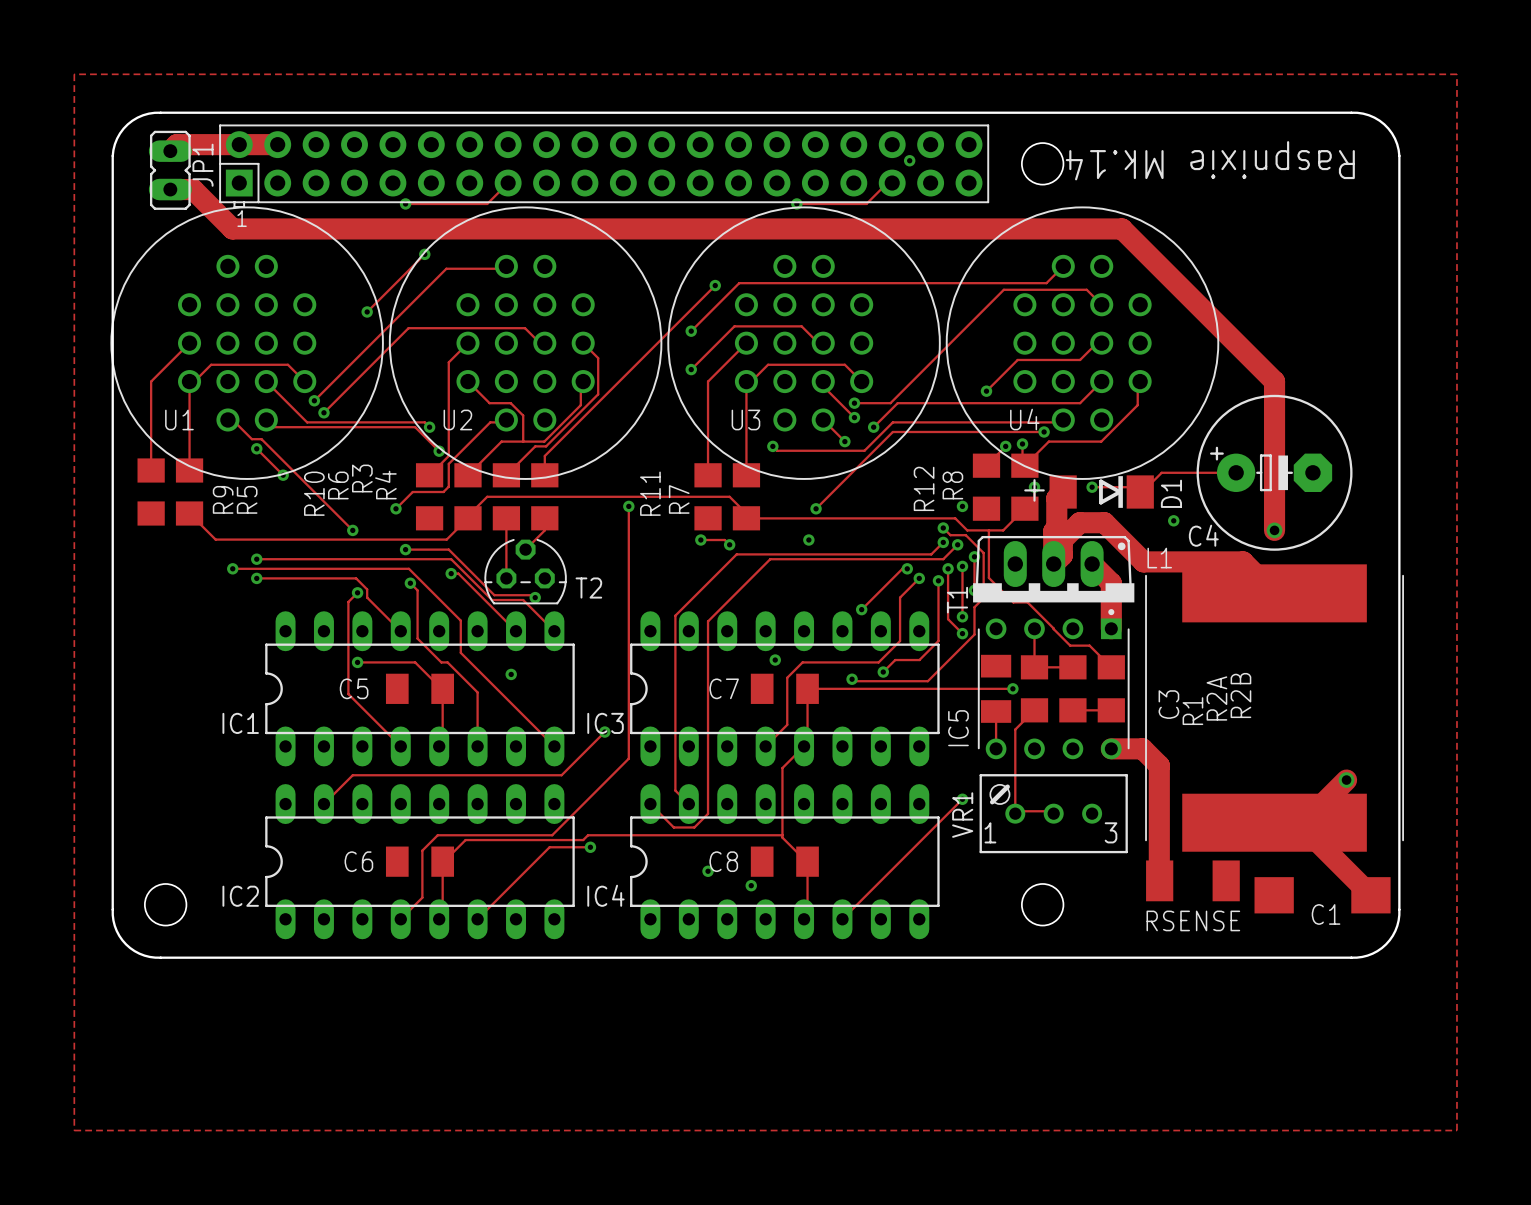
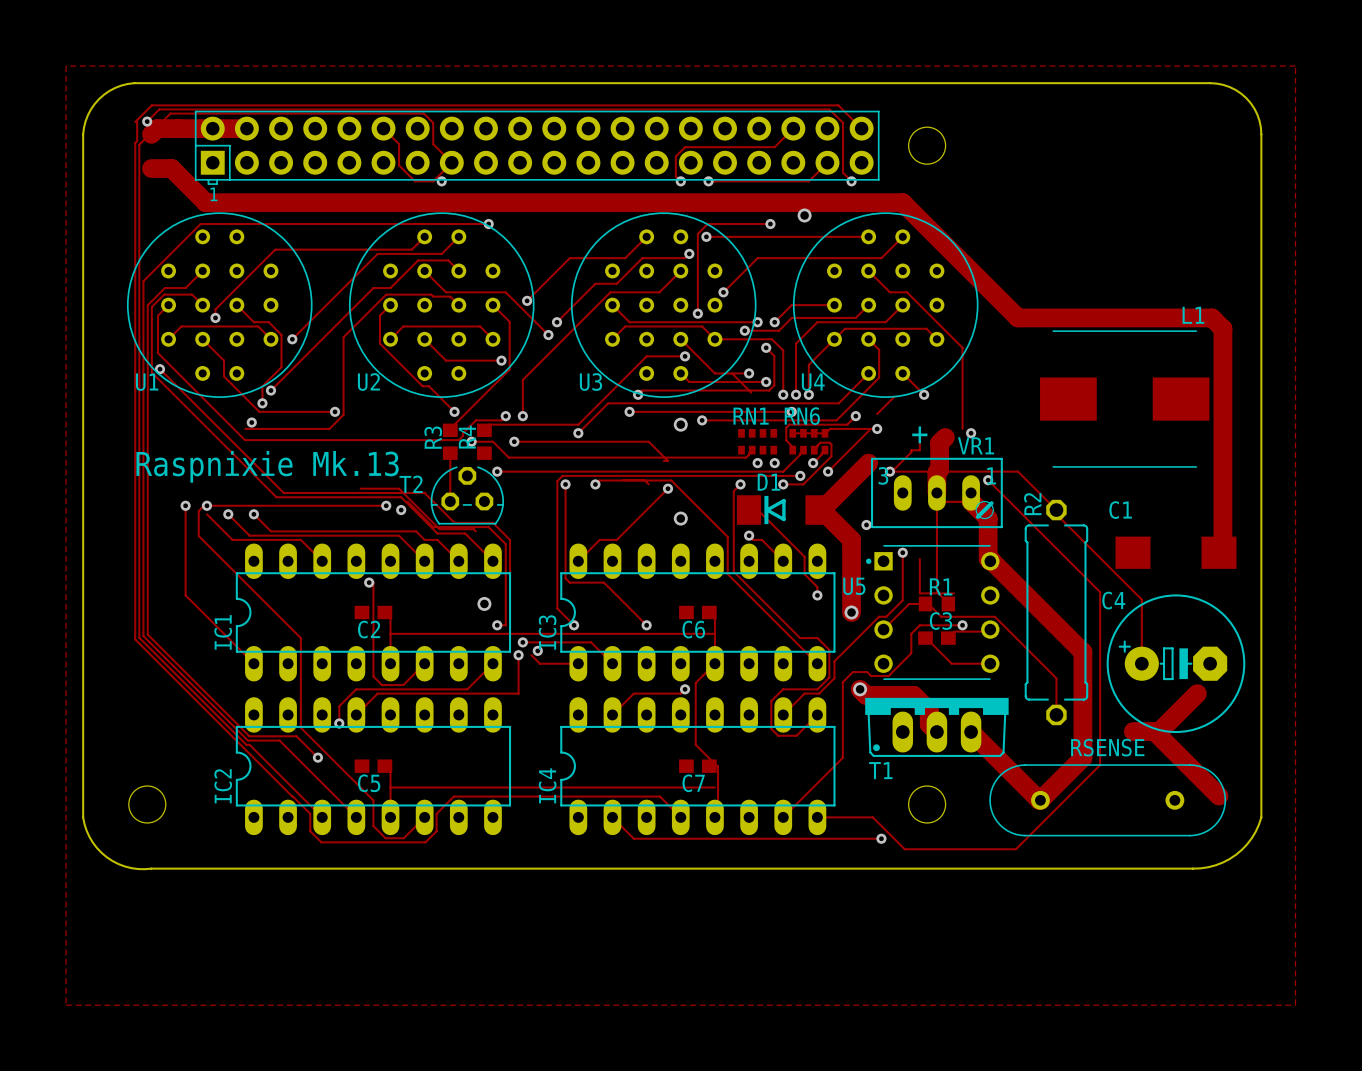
board edge: (160, 112) (1351, 112) (1369, 115) (1379, 120) (1388, 128) (1394, 138) (1399, 155) (1399, 915) (1392, 935) (1377, 951) (1356, 957) (160, 957) (144, 955) (134, 951) (119, 935) (112, 915) (112, 155) (117, 138) (127, 124) (143, 115) (160, 112) -> (134, 83) (115, 87) (99, 99) (87, 115) (83, 134) (83, 817) (89, 836) (96, 847) (106, 857) (124, 866) (144, 869) (1193, 868) (1208, 867) (1229, 859) (1241, 849) (1251, 838) (1261, 817) (1261, 134) (1259, 121) (1254, 108) (1241, 93) (1223, 84) (1210, 83) (134, 83)
track: none -> (137, 120) (137, 141) (135, 143) (135, 639) (310, 813) (310, 831) (321, 842) (425, 842) (436, 831) (436, 813) (453, 796) (659, 796) (680, 817)
track: none -> (147, 121) (159, 109) (829, 109) (843, 122) (843, 172) (851, 181)
via: none -> (147, 121)
track: none -> (135, 121) (151, 105) (838, 105) (861, 128)
track: none -> (793, 128) (774, 147) (685, 147) (675, 156) (675, 176) (680, 181)
via: (909, 160) -> none
text: Raspnixie Mk.14 (1210, 160) -> none
JP1: (170, 170) -> none
track: none -> (451, 162) (433, 144) (433, 122) (423, 113) (170, 113) (139, 144) (139, 637) (322, 817)
track: (892, 183) (885, 184) (866, 203) -> (827, 162) (808, 181) (770, 181)
track: (405, 203) (466, 203) -> (383, 128) (399, 144) (399, 165) (415, 181)
via: (405, 203) -> none
via: none -> (441, 181)
via: none -> (680, 181)
via: none -> (851, 181)
U1 footprint: [110, 206, 384, 480] -> [126, 212, 313, 398]
U2 footprint: [388, 206, 663, 480] -> [348, 212, 535, 398]
U3 footprint: [667, 206, 941, 480] -> [570, 212, 757, 398]
U4 footprint: [945, 206, 1220, 480] -> [792, 212, 979, 398]
track: (231, 227) (1122, 228) (1274, 381) (1274, 530) -> (205, 202) (902, 202) (1018, 317) (1212, 317) (1222, 328) (1222, 548) (1219, 552)
via: none -> (804, 215)
via: none -> (488, 224)
track: none -> (770, 224) (707, 224) (697, 233) (697, 313)
via: none -> (770, 224)
track: (424, 254) (367, 311) -> none
via: (424, 254) -> none
track: none -> (424, 236) (411, 249) (275, 249) (215, 309) (215, 317)
track: (506, 266) (504, 268) (446, 268) (314, 400) -> none
track: none -> (458, 236) (441, 253) (377, 253) (292, 339)
track: none -> (646, 236) (625, 258) (569, 258) (527, 300)
track: none -> (706, 236) (868, 236)
via: none -> (706, 236)
track: none -> (902, 236) (881, 258) (757, 258) (723, 292)
track: (1063, 266) (1046, 283) (739, 283) (691, 331) -> none
track: (715, 285) (544, 455) (544, 475) -> none
via: (715, 285) -> none
track: none -> (689, 253) (685, 258) (642, 258) (616, 283) (595, 283) (557, 322)
via: none -> (689, 253)
track: none -> (202, 270) (185, 288) (164, 288) (147, 305) (147, 634) (249, 736) (296, 736) (317, 757)
track: none -> (424, 270) (446, 292) (505, 292) (518, 305)
track: none -> (458, 270) (448, 260) (418, 260) (390, 288) (373, 288) (270, 390)
track: none -> (680, 270) (659, 292) (610, 292) (522, 379) (522, 416)
track: none -> (868, 270) (889, 292) (907, 292) (962, 347) (962, 428)
track: (1101, 304) (1086, 289) (1003, 289) (890, 403) (854, 403) -> none
via: (367, 311) -> none
via: none -> (723, 292)
via: (691, 331) -> none
via: none -> (527, 300)
track: none -> (236, 305) (253, 322) (268, 322) (281, 334) (281, 367) (262, 386) (262, 403)
track: none -> (390, 305) (379, 315) (379, 343) (422, 386) (428, 386) (454, 411)
track: (467, 343) (448, 362) (448, 455) (429, 475) -> none
track: none -> (458, 305) (450, 296) (386, 294) (343, 337) (343, 414) (329, 428) (245, 428)
track: (544, 343) (540, 343) (525, 328) (408, 328) (323, 412) -> none
track: none -> (492, 305) (509, 321) (509, 369) (450, 430)
track: none -> (612, 305) (629, 322) (757, 322)
track: (746, 343) (708, 381) (708, 475) -> none
track: (823, 343) (818, 343) (801, 326) (734, 326) (691, 369) -> none
track: none -> (834, 305) (791, 305) (774, 322)
track: none -> (868, 305) (855, 317) (791, 317) (778, 330) (744, 330)
track: none -> (902, 305) (885, 322) (817, 322) (796, 343) (796, 394)
track: (1101, 343) (1096, 343) (1080, 359) (1017, 359) (986, 391) -> none
via: none -> (697, 313)
track: (177, 355) (151, 381) (151, 470) -> (158, 315) (158, 353) (245, 440) (458, 440) (475, 420) (501, 420) (505, 416)
via: none -> (215, 317)
track: (598, 358) (598, 394) (546, 446) (535, 446) (506, 475) -> (531, 318) (548, 335)
via: none -> (557, 322)
via: none -> (757, 322)
via: none -> (774, 322)
track: (290, 367) (287, 364) (211, 364) (194, 381) (189, 381) (189, 470) -> (258, 326) (181, 326) (168, 339)
via: (691, 369) -> none
via: none -> (744, 330)
via: none -> (548, 335)
track: none -> (202, 339) (224, 360) (224, 376) (259, 411) (335, 411)
track: (266, 381) (307, 422) (424, 422) (429, 427) -> none
via: none -> (292, 339)
track: none -> (390, 339) (403, 326) (480, 326) (492, 339)
track: (467, 381) (489, 403) (510, 403) (523, 415) (523, 441) -> none
track: none -> (424, 339) (446, 360) (501, 360)
track: (583, 381) (580, 383) (580, 405) (544, 441) (501, 441) (467, 475) -> none
track: none -> (612, 339) (625, 326) (702, 326) (714, 339) (771, 339) (783, 350) (783, 394)
track: none -> (680, 339) (714, 373) (749, 373)
track: (823, 381) (823, 386) (854, 417) -> none
track: (861, 381) (844, 364) (768, 364) (751, 381) (746, 381) (746, 475) -> none
track: none -> (868, 339) (879, 349) (879, 377) (836, 420) (702, 420)
track: none -> (936, 339) (926, 328) (845, 328) (808, 364) (808, 394)
track: (1101, 381) (1080, 403) (897, 403) (873, 427) -> none
track: (1140, 381) (1137, 383) (1137, 405) (1101, 441) (1048, 441) (1024, 465) (1034, 455) (1022, 455) (1022, 443) -> none
track: none -> (766, 347) (774, 355) (774, 385) (769, 390) (642, 390) (638, 394)
via: none -> (766, 347)
via: (986, 391) -> none
via: (314, 400) -> none
track: none -> (685, 356) (646, 356) (578, 424) (488, 424) (484, 430)
via: none -> (685, 356)
via: (854, 403) -> none
via: none -> (501, 360)
via: (323, 412) -> none
track: none -> (160, 369) (283, 492) (424, 492) (454, 522) (492, 522) (510, 539) (510, 633)
via: none -> (160, 369)
via: (854, 417) -> none
track: (227, 419) (232, 419) (251, 439) (261, 439) (352, 530) -> none
track: (266, 419) (273, 427) (415, 427) (439, 451) -> none
track: (506, 419) (504, 422) (490, 422) (448, 463) (448, 486) (443, 492) (412, 492) (395, 508) -> none
track: none -> (680, 373) (689, 381) (766, 381)
via: none -> (749, 373)
track: none -> (868, 373) (838, 403) (608, 403) (578, 433)
track: none -> (902, 373) (924, 394)
track: (1063, 419) (1060, 422) (892, 422) (864, 450) (777, 450) (772, 446) -> none
via: (429, 427) -> none
via: (873, 427) -> none
via: none -> (766, 381)
track: (1044, 431) (892, 431) (816, 508) -> none
via: (1044, 431) -> none
via: none -> (270, 390)
via: (844, 441) -> none
via: none -> (638, 394)
via: none -> (783, 394)
via: none -> (796, 394)
via: none -> (808, 394)
via: (1022, 443) -> none
via: none -> (924, 394)
via: (772, 446) -> none
via: (1005, 446) -> none
track: (256, 448) (283, 475) -> none
via: (256, 448) -> none
via: (439, 451) -> none
via: none -> (262, 403)
via: none -> (335, 411)
R3 footprint: [492, 463, 521, 531] -> [442, 423, 458, 460]
via: none -> (454, 411)
R4 footprint: [531, 463, 559, 531] -> [477, 423, 492, 460]
track: none -> (629, 411) (791, 411)
via: none -> (629, 411)
via: none -> (791, 411)
via: none -> (505, 416)
via: none -> (522, 416)
track: none -> (855, 416) (847, 424) (789, 424) (786, 427) (786, 440) (792, 446) (792, 450)
via: none -> (855, 416)
via: none -> (702, 420)
track: (1236, 472) (1161, 472) (1142, 492) (1135, 487) (1092, 487) -> none
C4 position: (1274, 472) -> (1175, 663)
via: none -> (680, 424)
R3 name position: R3 (362, 478) -> R3 (433, 437)
track: none -> (870, 428) (828, 471)
track: none -> (877, 428) (830, 428) (825, 433) (792, 433)
via: none -> (877, 428)
R4 name position: R4 (385, 485) -> R4 (467, 437)
via: none -> (578, 433)
R12: (986, 487) -> none
R8: (1024, 487) -> none
via: (1034, 487) -> none
R9: (151, 492) -> none
R5: (189, 492) -> none
D1 rotation: 0° (1101, 492) -> 180° (783, 510)
D1 position: (1101, 492) -> (783, 510)
D1 name position: D1 (1171, 493) -> D1 (768, 482)
R10: (429, 496) -> none
R6: (467, 496) -> none
track: (530, 496) (487, 496) (446, 539) (215, 539) (189, 513) -> none
via: none -> (471, 441)
track: (554, 496) (578, 496) -> (492, 441) (508, 457) (746, 457) (752, 450)
via: none -> (514, 441)
R11: (708, 496) -> none
R7: (746, 496) -> none
RN1: none -> (757, 441)
RN6: none -> (808, 441)
track: (628, 506) (628, 758) (552, 835) (437, 835) (422, 850) (422, 897) (400, 919) -> (488, 224) (200, 224) (143, 281) (143, 636) (247, 740) (279, 740) (356, 817)
via: (628, 506) -> none
track: none -> (803, 450) (783, 471) (497, 471)
track: none -> (814, 450) (820, 442) (829, 442) (831, 444) (831, 456) (803, 484) (783, 484)
track: none -> (824, 450) (813, 463)
via: (962, 506) -> none
via: (395, 508) -> none
via: (816, 508) -> none
track: (544, 518) (544, 530) (525, 549) -> none
track: (746, 518) (955, 518) (967, 530) (1000, 530) -> none
via: none -> (757, 463)
via: none -> (774, 463)
via: none -> (813, 463)
track: none -> (868, 463) (821, 510)
via: (1173, 520) -> none
text: none -> Raspnixie Mk.13 (267, 466)
track: (943, 528) (950, 535) (965, 535) (983, 553) (983, 598) (974, 607) (974, 634) (927, 681) (854, 681) -> (817, 663) (759, 605)
via: (943, 528) -> none
via: (352, 530) -> none
via: none -> (497, 471)
via: none -> (828, 471)
track: (988, 530) (988, 577) (1013, 602) (1027, 602) (1053, 628) -> (936, 501) (936, 558)
via: none -> (889, 471)
track: none -> (892, 471) (1018, 471) (1056, 510) (1056, 514) (1141, 599) (1141, 663)
via: (1274, 530) -> none
track: none -> (800, 475) (562, 475) (557, 481) (557, 608) (574, 625)
via: none -> (800, 475)
C4 name position: C4 (1203, 535) -> C4 (1113, 600)
via: (700, 540) -> none
via: (808, 540) -> none
track: none -> (988, 480) (1100, 592) (1100, 765) (1015, 849) (904, 849) (872, 817) (817, 817)
via: none -> (988, 480)
track: (943, 542) (931, 554) (736, 554) (675, 615) (675, 790) (688, 804) -> (685, 689) (680, 693) (633, 693) (612, 714)
via: (943, 542) -> none
track: none -> (565, 484) (565, 578) (569, 582) (603, 582) (646, 625)
via: none -> (565, 484)
track: none -> (595, 484) (599, 480) (671, 480) (727, 536) (727, 574) (757, 603)
via: none -> (595, 484)
via position: (729, 544) -> (667, 488)
track: none -> (740, 484) (733, 491) (733, 571) (800, 638) (817, 638) (829, 649) (829, 677) (817, 689) (783, 689) (771, 701) (771, 728) (778, 735) (796, 735) (817, 714)
via: none -> (740, 484)
via: none -> (783, 484)
track: (957, 544) (943, 559) (770, 559) (708, 621) (708, 813) (694, 827) (673, 827) (650, 804) -> none
via: (957, 544) -> none
via: (405, 549) -> none
track: none -> (667, 488) (616, 539) (599, 539) (578, 561)
track: (974, 556) (974, 590) -> none
via: (974, 556) -> none
L1 name position: L1 (1159, 558) -> L1 (1193, 315)
track: (256, 559) (310, 559) -> (202, 305) (192, 294) (164, 294) (151, 306) (151, 372) (276, 497)
via: (256, 559) -> none
track: none -> (407, 501) (433, 527) (488, 527) (505, 544) (505, 625) (497, 625)
track: (1053, 564) (1062, 555) (1062, 540) (1079, 522) (1104, 522) (1143, 561) (1243, 561) (1274, 593) -> (936, 501) (962, 501) (971, 492)
L1 footprint: [1145, 564, 1404, 852] -> [1040, 330, 1210, 468]
track: (962, 566) (962, 616) -> none
via: (962, 566) -> none
track: none -> (185, 505) (185, 595) (253, 663)
via: none -> (185, 505)
track: (408, 568) (460, 620) (460, 652) (554, 746) -> (363, 505) (386, 505)
via: none -> (386, 505)
track: (907, 568) (902, 568) (861, 609) -> none
via: (907, 568) -> none
track: (948, 568) (948, 619) (962, 633) -> none
via: (948, 568) -> none
T1 rotation: 0° (1053, 569) -> 180° (936, 727)
T1 position: (1053, 569) -> (936, 727)
T2 position: (525, 571) -> (467, 495)
track: (451, 573) (458, 573) (492, 607) -> (253, 514) (270, 531) (416, 531) (424, 539) (437, 539)
track: none -> (748, 510) (757, 510) (804, 556) (804, 574) (817, 587) (817, 595)
track: none -> (821, 510) (851, 539) (851, 612)
track: none -> (206, 514) (232, 539) (300, 539) (322, 561)
track: (256, 578) (356, 578) (367, 589) (367, 597) (400, 631) -> (228, 514) (249, 535) (399, 535) (424, 561)
via: none -> (253, 514)
track: (919, 578) (900, 597) (900, 641) (878, 662) (802, 662) (787, 677) (787, 724) (765, 746) -> none
via: (919, 578) -> none
track: (938, 580) (938, 641) (919, 660) (895, 660) (883, 672) -> none
via: (938, 580) -> none
track: (410, 583) (417, 590) (417, 638) (441, 662) (447, 662) (477, 692) (477, 746) -> (369, 582) (373, 582) (373, 676) (381, 685) (403, 685) (424, 663)
via: (410, 583) -> none
via: none -> (680, 518)
T2 name position: T2 (588, 588) -> T2 (411, 484)
track: (357, 592) (348, 601) (348, 694) (400, 746) -> none
via: (357, 592) -> none
via: (535, 597) -> none
T1 name position: T1 (957, 600) -> T1 (880, 770)
track: none -> (749, 535) (753, 539) (761, 539) (783, 561)
via position: (861, 609) -> (749, 535)
via: (962, 616) -> none
track: none -> (902, 552) (902, 600) (886, 616) (879, 616) (834, 661) (834, 678) (819, 693) (804, 693) (783, 714)
via: none -> (902, 552)
track: (1053, 629) (1070, 645) (1089, 645) (1111, 667) -> (936, 559) (936, 591) (948, 603)
track: none -> (990, 561) (1082, 652) (1082, 757) (1039, 800) (971, 732)
via: (962, 633) -> none
C3 footprint: [980, 654, 1012, 723] -> [918, 631, 956, 645]
via: none -> (369, 582)
R1 footprint: [1020, 655, 1049, 723] -> [918, 596, 956, 612]
via: (775, 660) -> none
track: (357, 662) (415, 662) (442, 688) (442, 742) (439, 746) -> (384, 612) (390, 618) (390, 663)
via: (357, 662) -> none
via: none -> (817, 595)
via: (883, 672) -> none
C5 footprint: [385, 673, 455, 704] -> [354, 759, 393, 773]
C7 footprint: [750, 673, 819, 704] -> [679, 759, 717, 773]
via: (511, 674) -> none
via: none -> (484, 603)
via: (852, 679) -> none
IC5: (1053, 684) -> none
C5 name position: C5 (354, 688) -> C5 (369, 783)
C2: none -> (373, 612)
C7 name position: C7 (724, 688) -> C7 (693, 783)
via: none -> (851, 612)
track: (1012, 688) (807, 688) (807, 742) (804, 746) -> (709, 612) (714, 618) (714, 663)
via: (1012, 688) -> none
U5: none -> (932, 612)
R2A: (1072, 688) -> none
R2B: (1111, 688) -> none
R2: none -> (1056, 612)
via: none -> (497, 625)
via: none -> (574, 625)
via: none -> (646, 625)
track: none -> (962, 625) (919, 625) (911, 633) (911, 653) (888, 675) (871, 675) (867, 672) (852, 672) (842, 682) (842, 757) (783, 817)
via: none -> (962, 625)
C3 name position: C3 (1168, 704) -> C3 (941, 621)
track: none -> (883, 629) (909, 603) (928, 603) (941, 616) (994, 616) (1056, 678) (1056, 714)
track: (1034, 710) (1015, 729) (1015, 813) -> none
track: (996, 711) (996, 748) -> none
R1 name position: R1 (1192, 711) -> R1 (941, 586)
track: none -> (390, 633) (714, 633)
track: none -> (925, 638) (951, 663) (990, 663)
track: none -> (522, 642) (591, 642) (612, 663)
via: none -> (522, 642)
IC1 name rotation: 0° (240, 723) -> 90° counterclockwise (223, 632)
IC3 name rotation: 0° (605, 723) -> 90° counterclockwise (547, 632)
track: (604, 732) (561, 775) (525, 775) -> (492, 663) (467, 689)
track: none -> (518, 655) (518, 693) (377, 693) (356, 714)
via: none -> (518, 655)
track: none -> (531, 655) (539, 663) (578, 663)
track: (1111, 748) (1142, 748) (1159, 765) (1159, 880) -> none
VR1 footprint: [979, 774, 1128, 854] -> [871, 457, 1003, 529]
track: (400, 775) (352, 775) (323, 804) -> (356, 689) (339, 706) (339, 723)
via: none -> (685, 689)
track: none -> (860, 689) (866, 695) (913, 695) (929, 710) (929, 724) (936, 732)
via: none -> (860, 689)
via: (1346, 780) -> none
track: (962, 799) (842, 919) -> none
via: (962, 799) -> none
track: (1015, 811) (1051, 811) (1053, 813) -> none
via: none -> (339, 723)
VR1 name position: VR1 (962, 815) -> VR1 (976, 445)
track: (782, 835) (588, 835) (583, 840) (465, 840) (442, 861) (442, 915) (439, 919) -> (384, 766) (390, 771) (390, 817)
C6 footprint: [385, 846, 455, 877] -> [679, 605, 717, 620]
track: (590, 847) (549, 847) (477, 919) -> (206, 505) (203, 505) (198, 510) (198, 536) (300, 638) (300, 727) (373, 800) (373, 826) (385, 838) (403, 838) (424, 817)
via: (590, 847) -> none
via: none -> (317, 757)
C6 name position: C6 (358, 861) -> C6 (693, 629)
C8: (784, 861) -> none
via: (708, 871) -> none
RSENSE: (1192, 880) -> none
track: none -> (390, 787) (714, 787)
via: (751, 885) -> none
IC4 name rotation: 0° (605, 895) -> 90° counterclockwise (547, 785)
C1 position: (1322, 895) -> (1175, 552)
IC2 name rotation: 0° (240, 896) -> 90° counterclockwise (223, 786)
RSENSE: none -> (1107, 800)
C1 name position: C1 (1326, 914) -> C1 (1120, 510)
track: none -> (612, 817) (633, 838) (881, 838)
via: none -> (881, 838)

